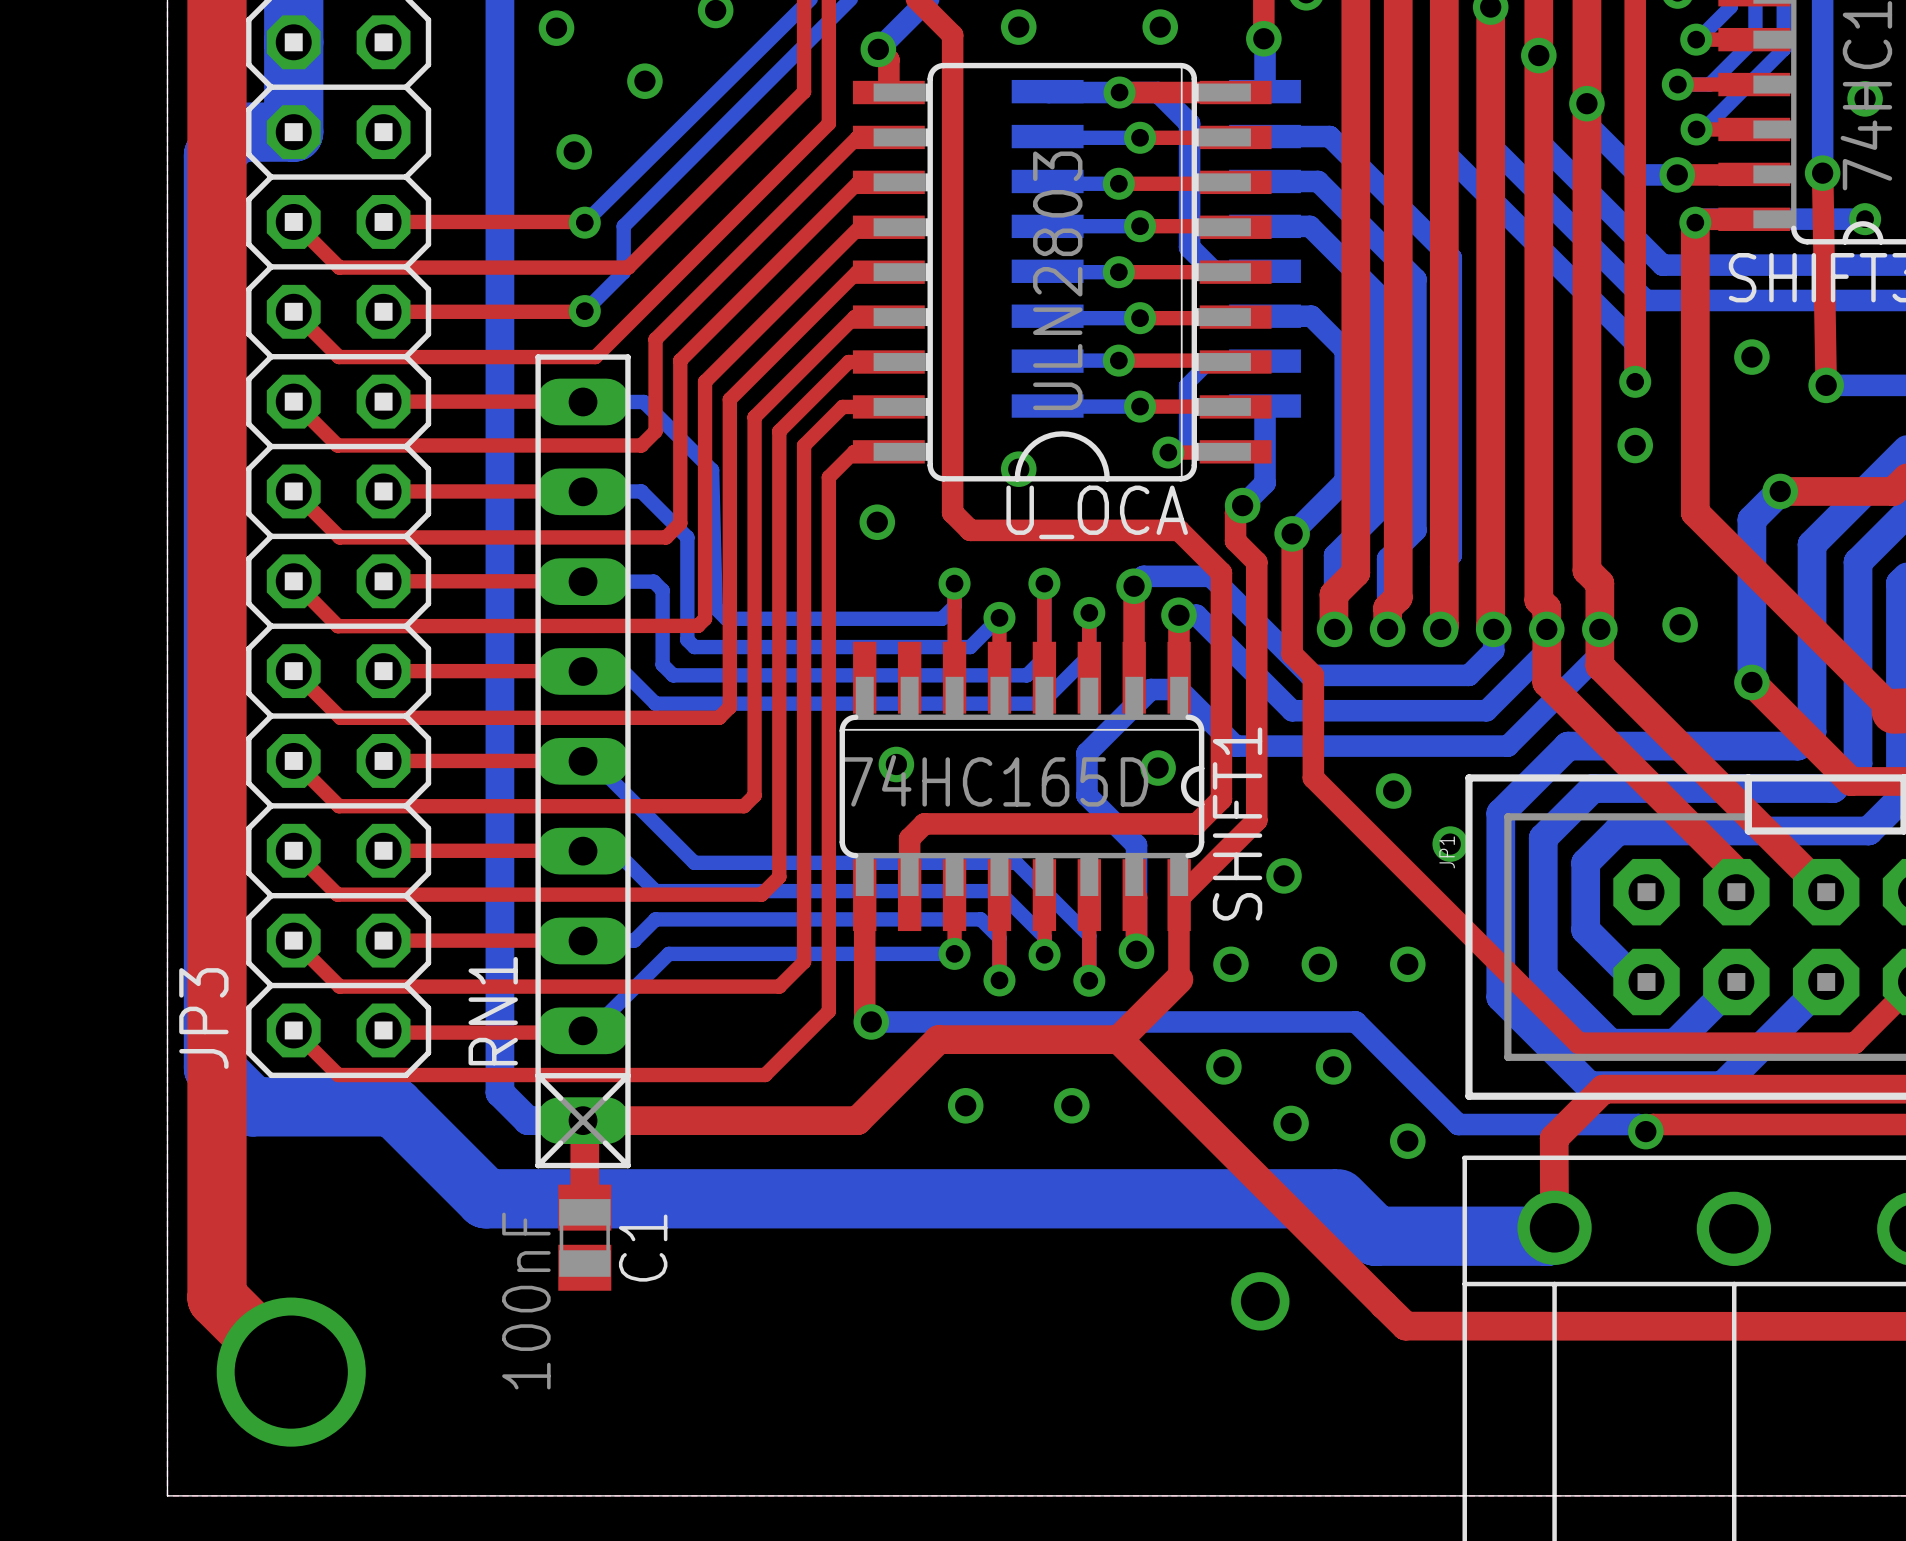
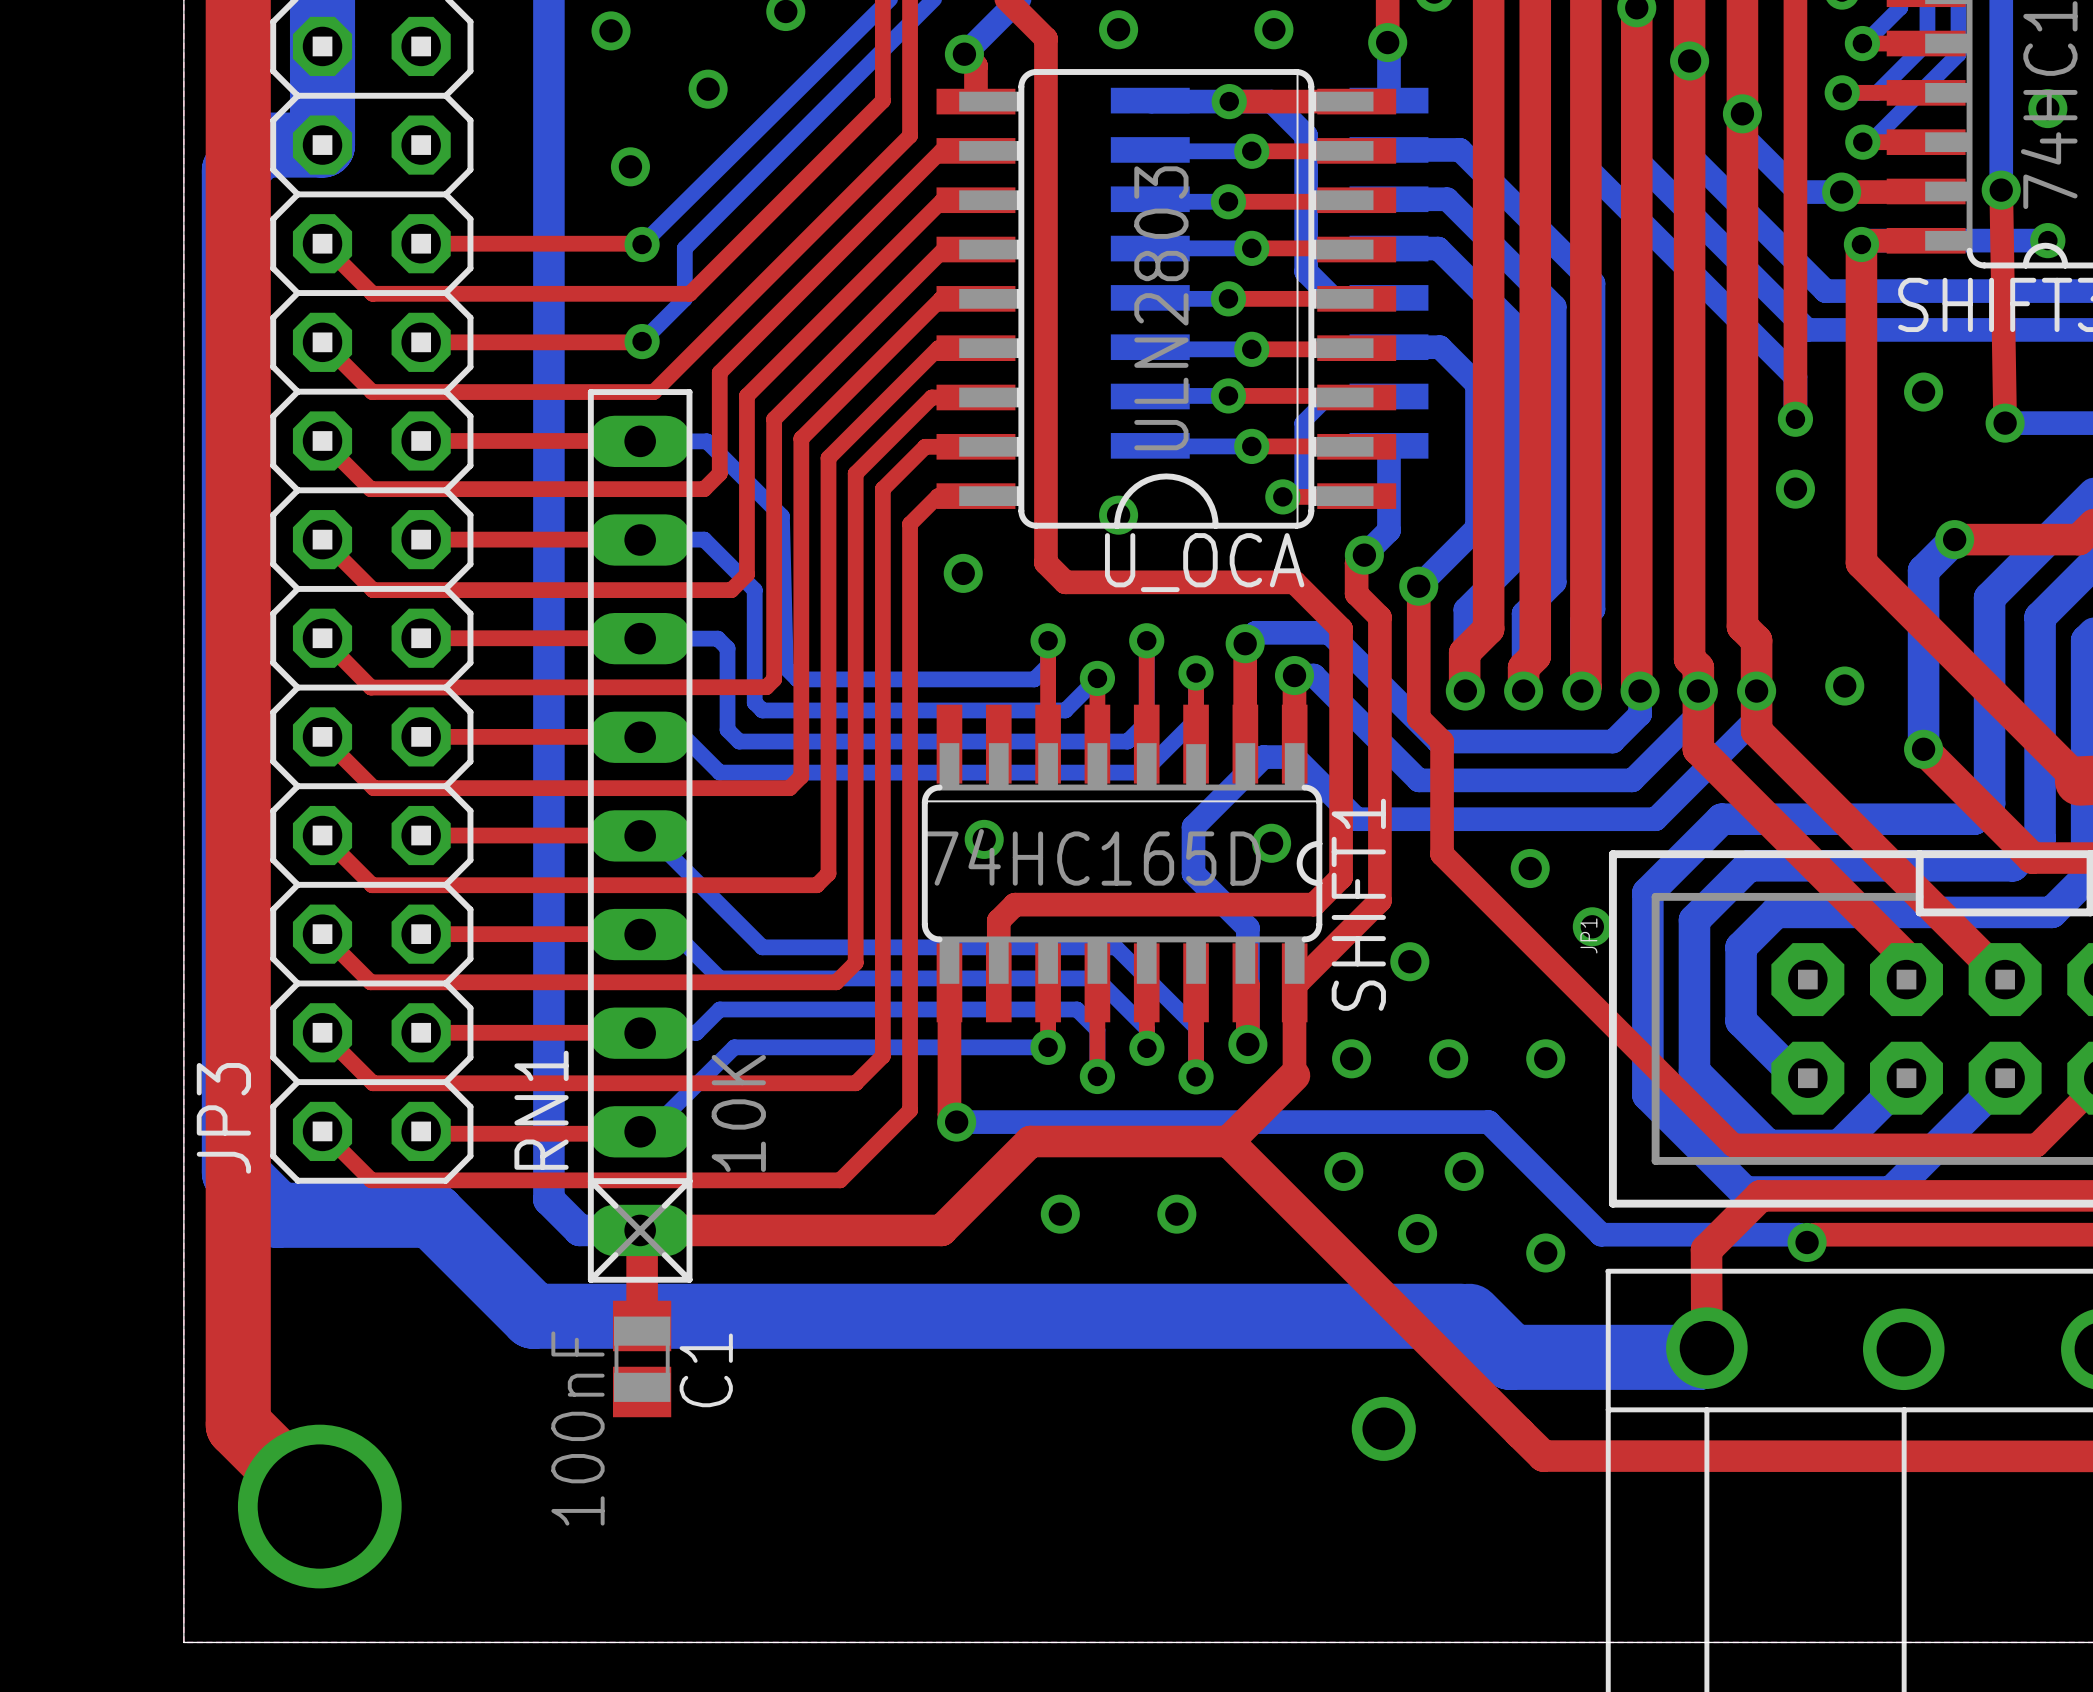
RN1 value: none -> 10K (738, 1113)

